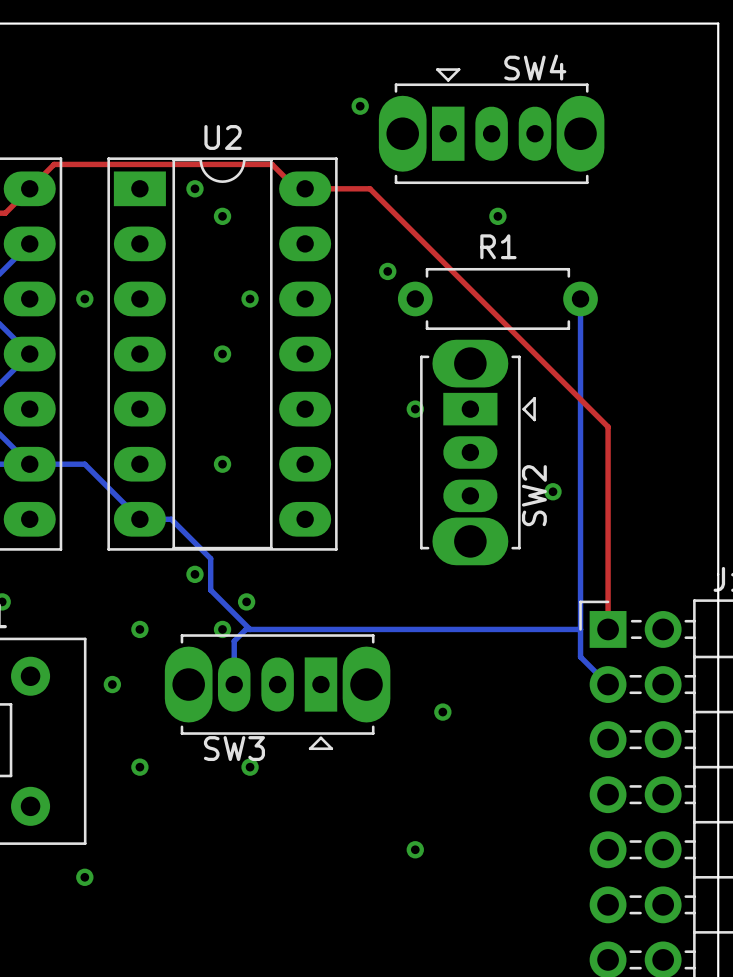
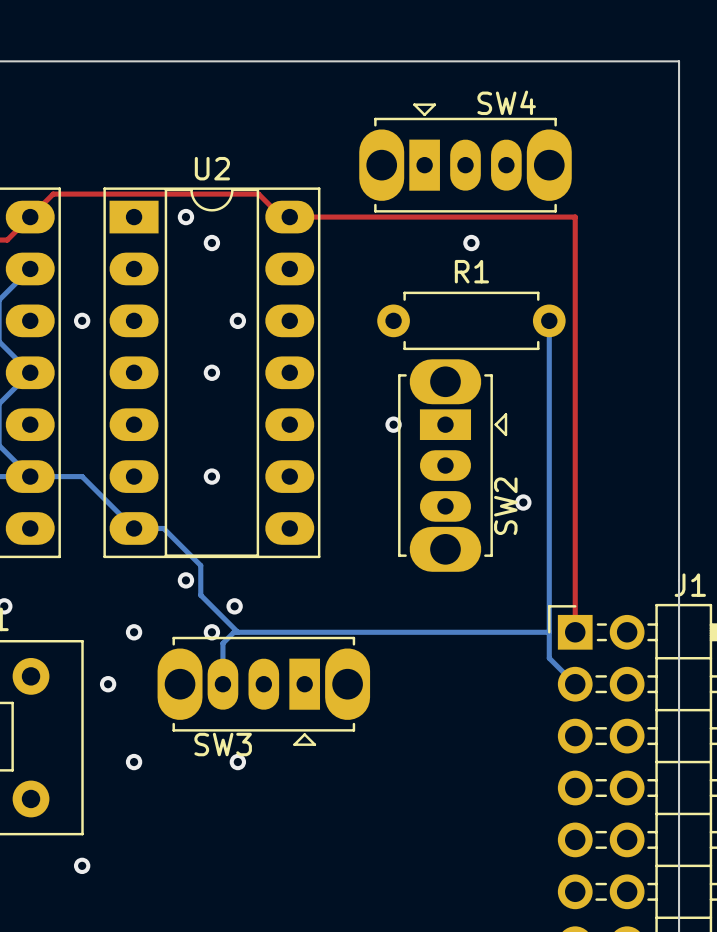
via: (360, 106) -> none
top track: (369, 188) (608, 426) -> (350, 217) (575, 217) (575, 441)
via: (387, 271) -> none
via: (442, 712) -> none
via: (415, 849) -> none

